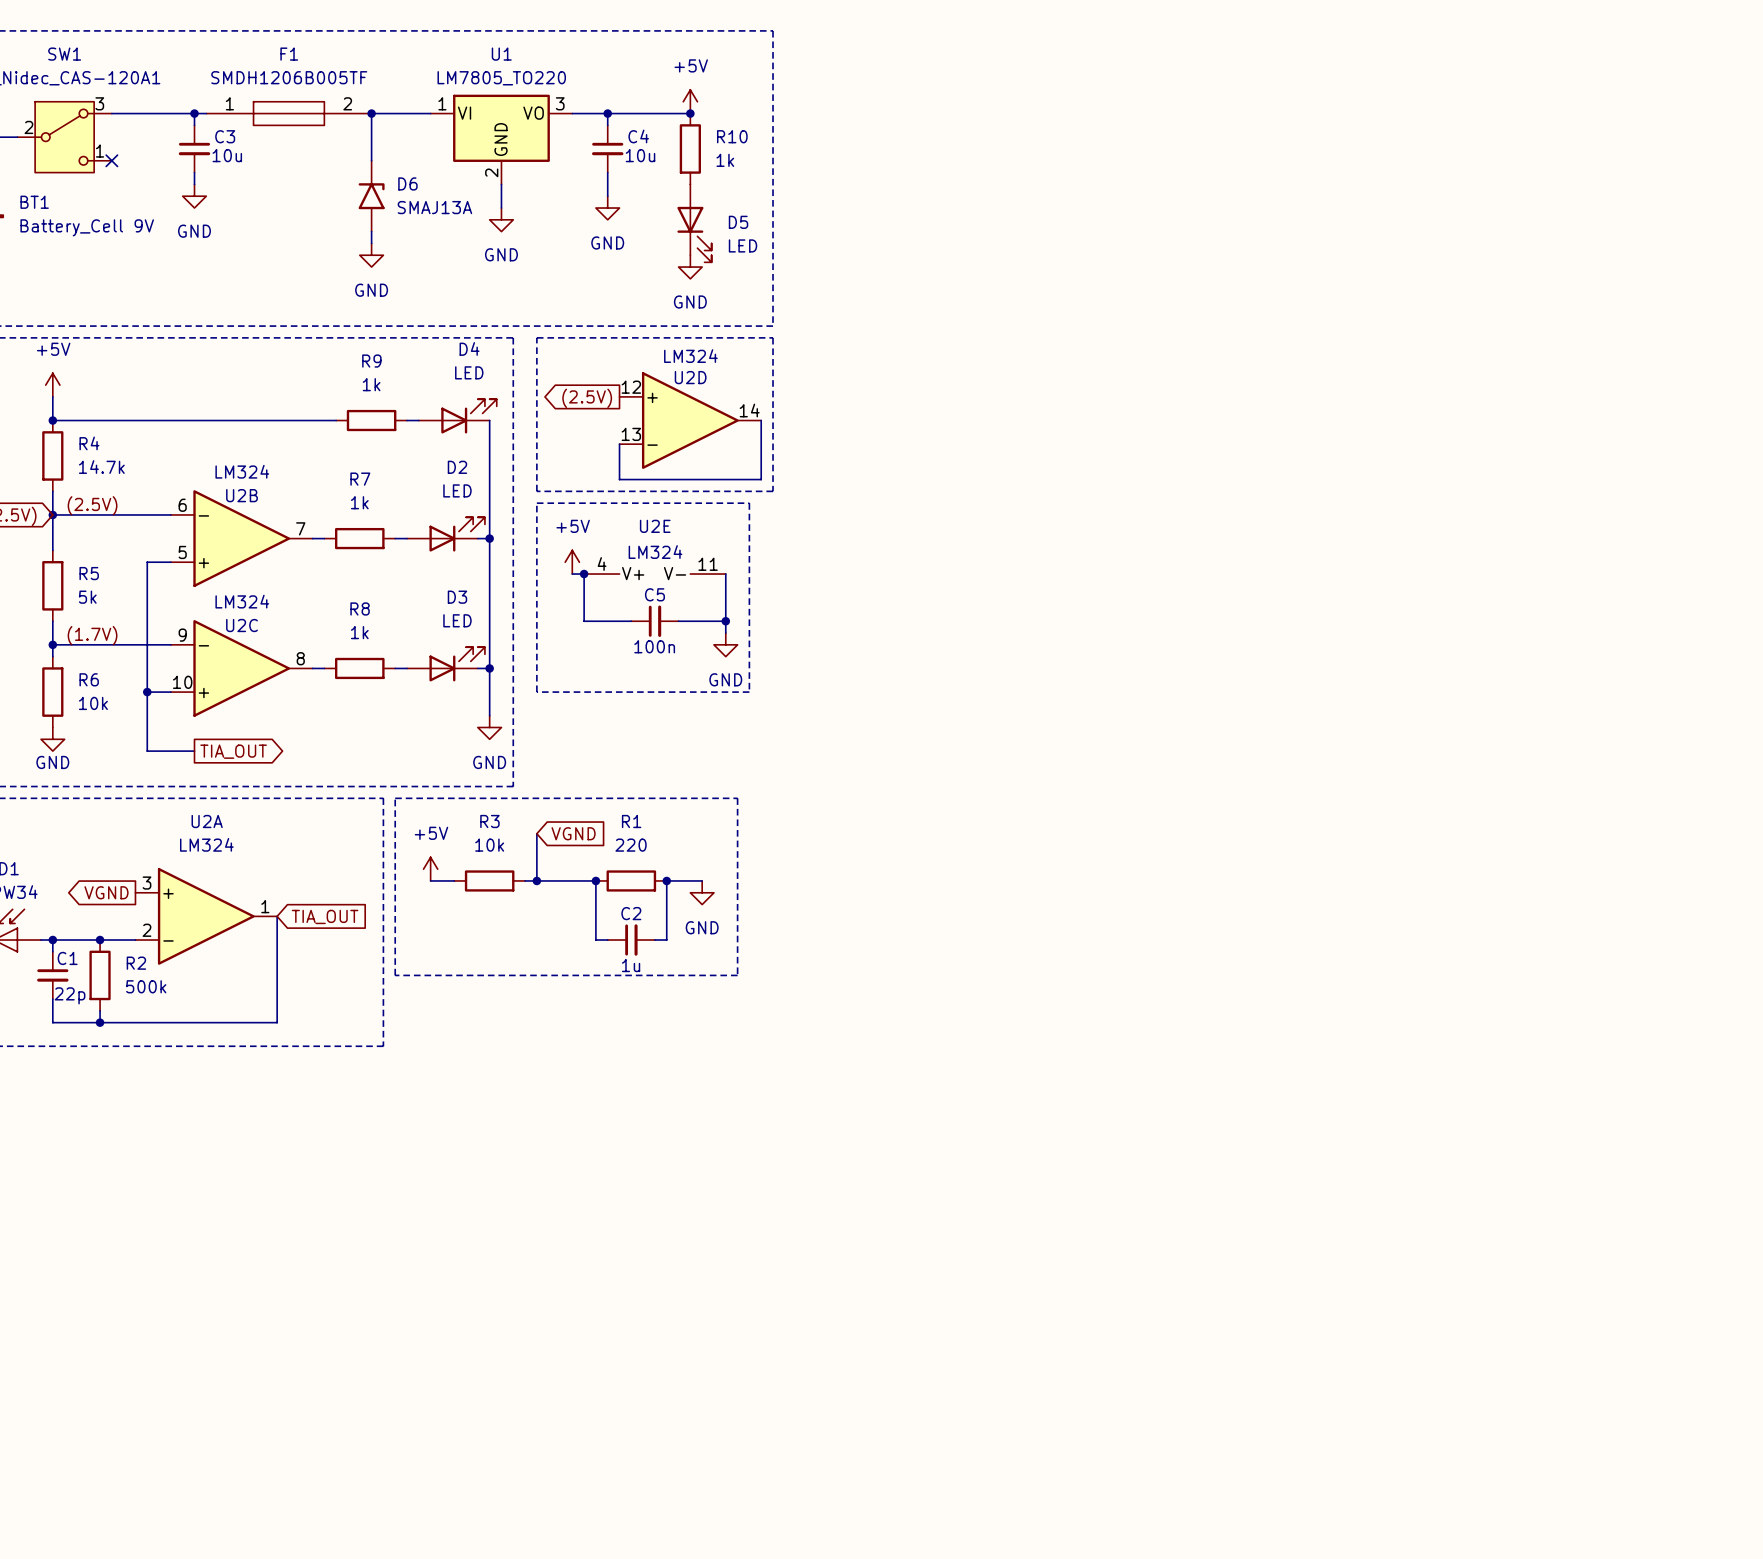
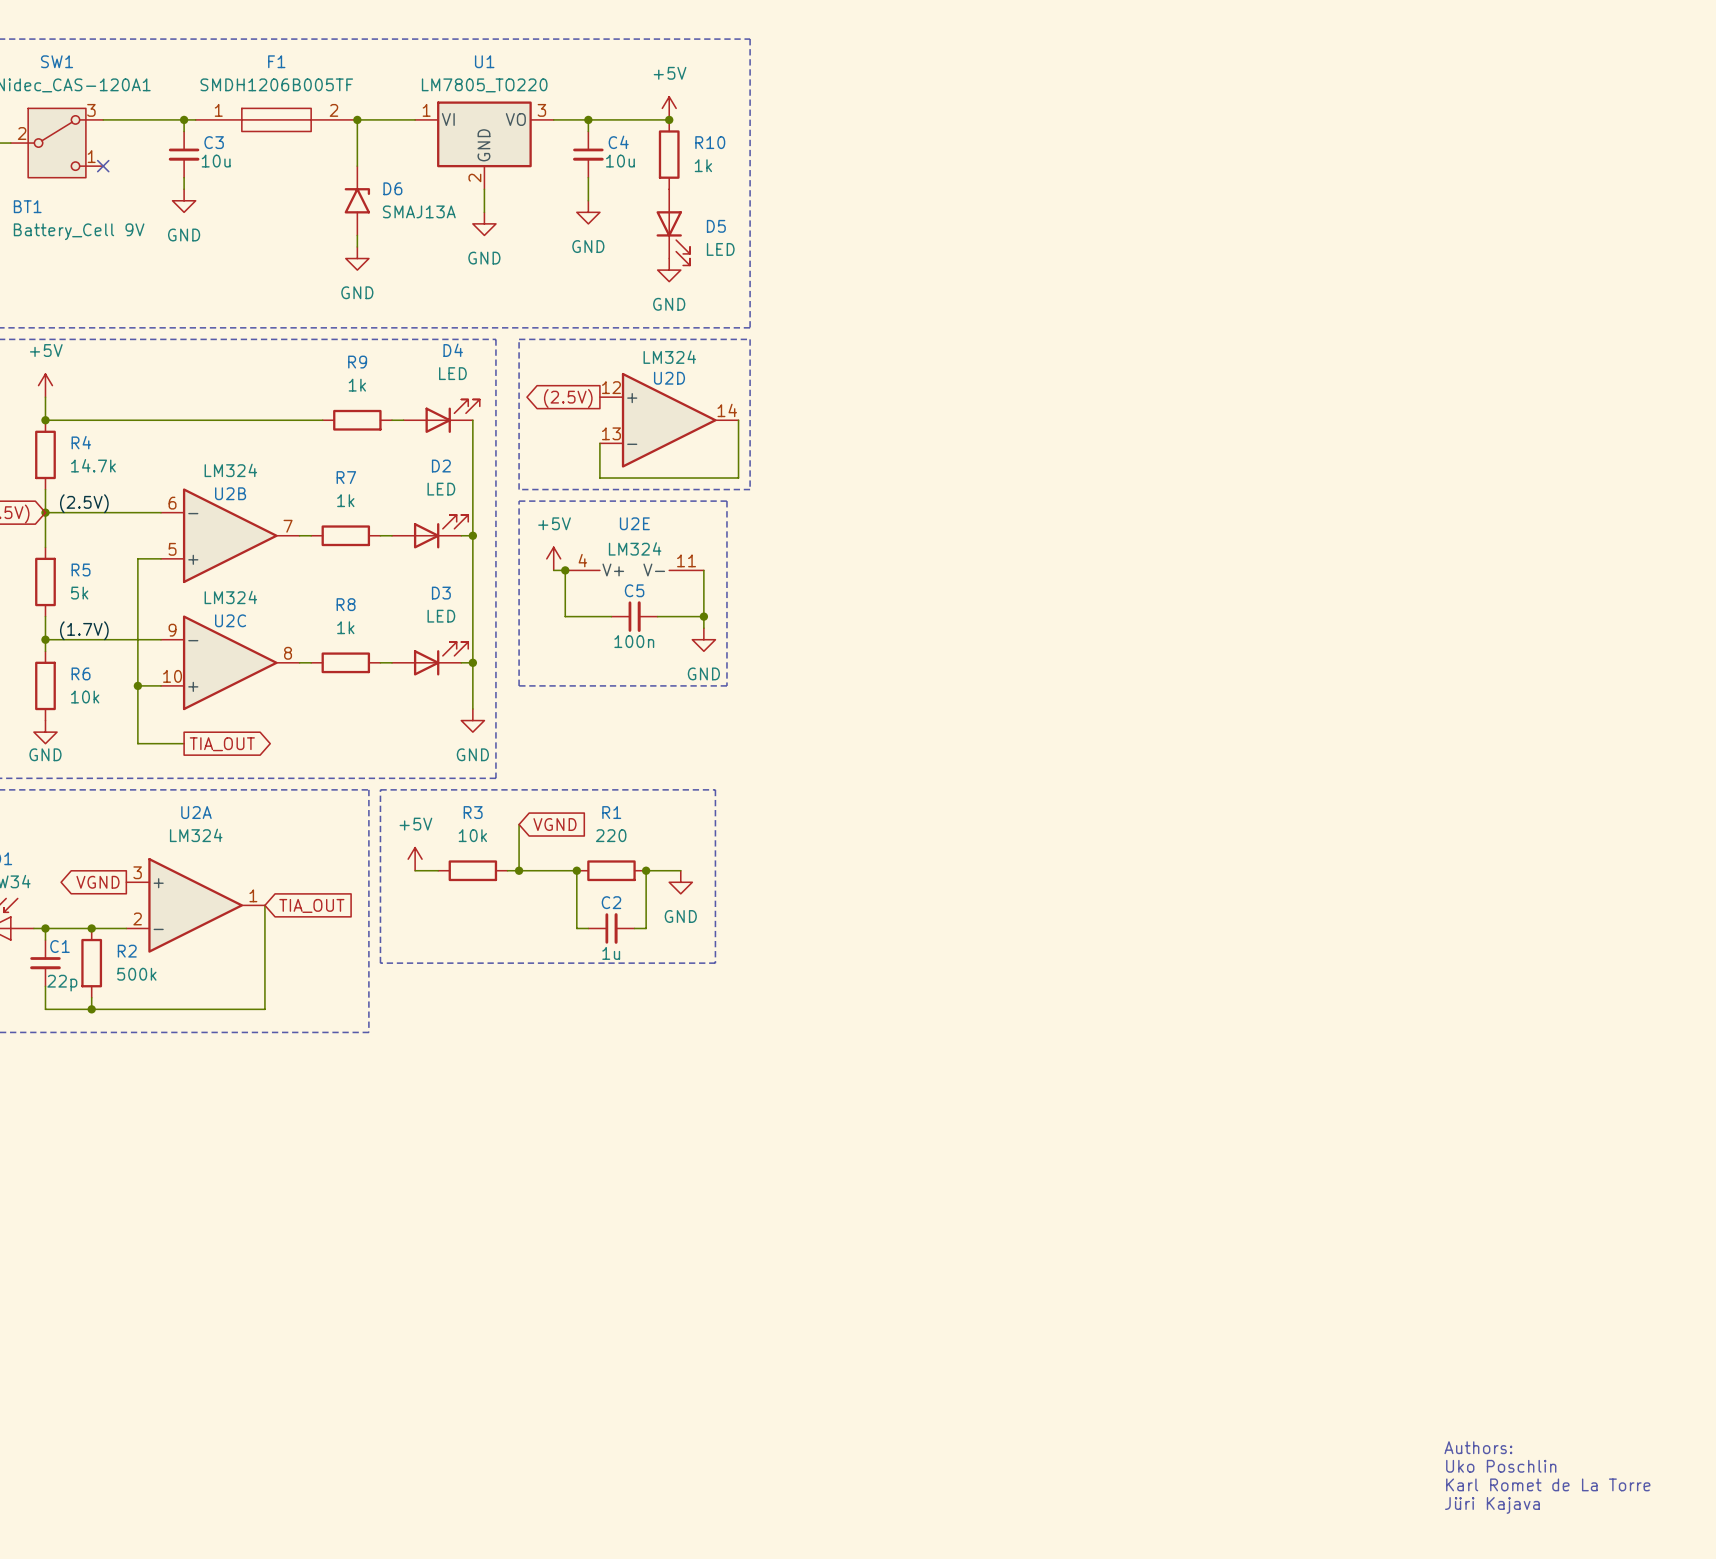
text: none -> Authors: (1478, 1447)
text: none -> Uko Poschlin (1501, 1466)
text: none -> Karl Romet de La Torre (1548, 1484)
text: none -> Jüri Kajava (1492, 1505)

